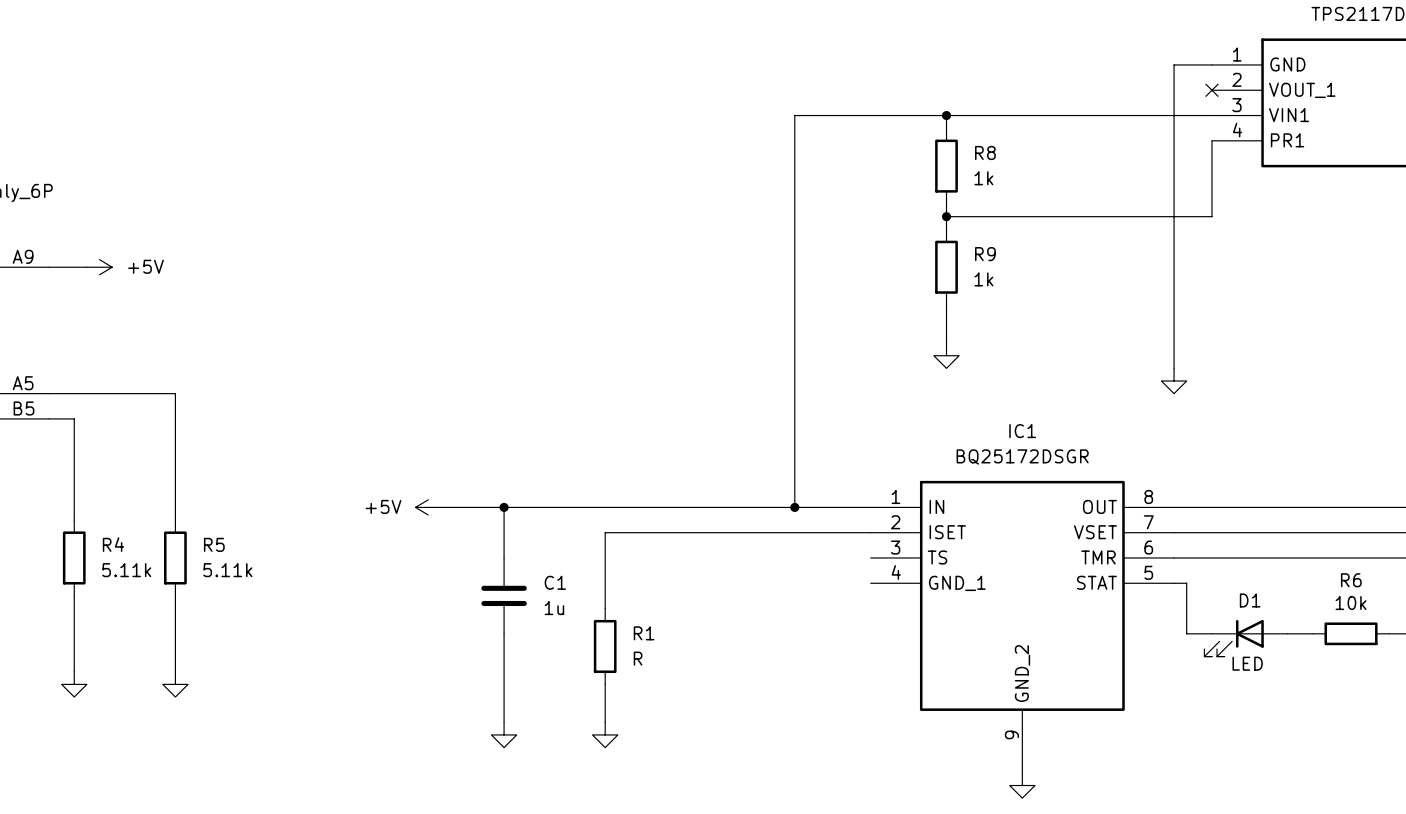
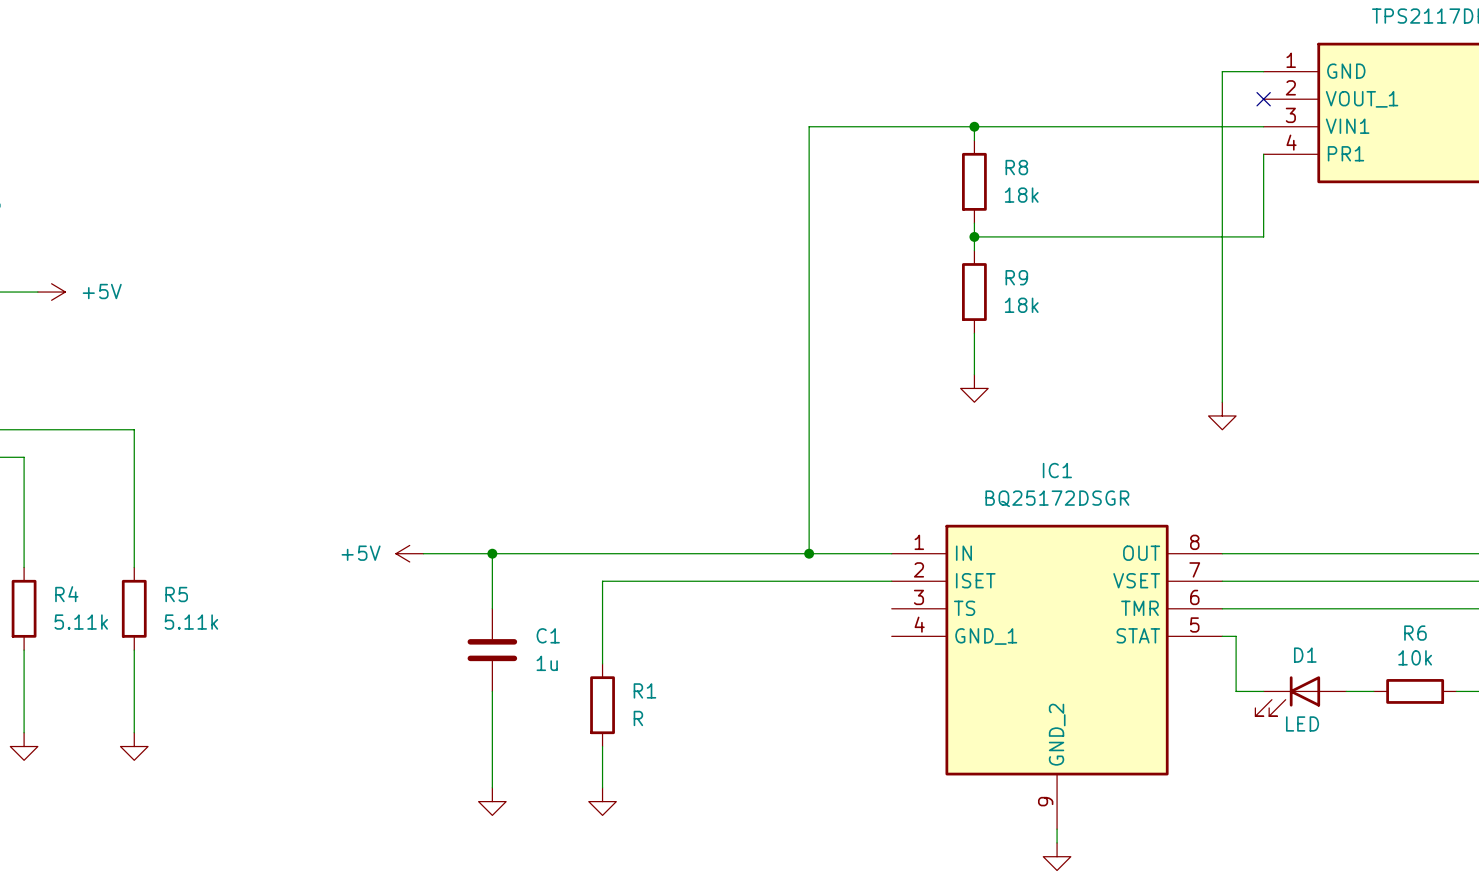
R8 value: 1k (983, 178) -> 18k (1021, 195)
R9 value: 1k (983, 279) -> 18k (1021, 305)

